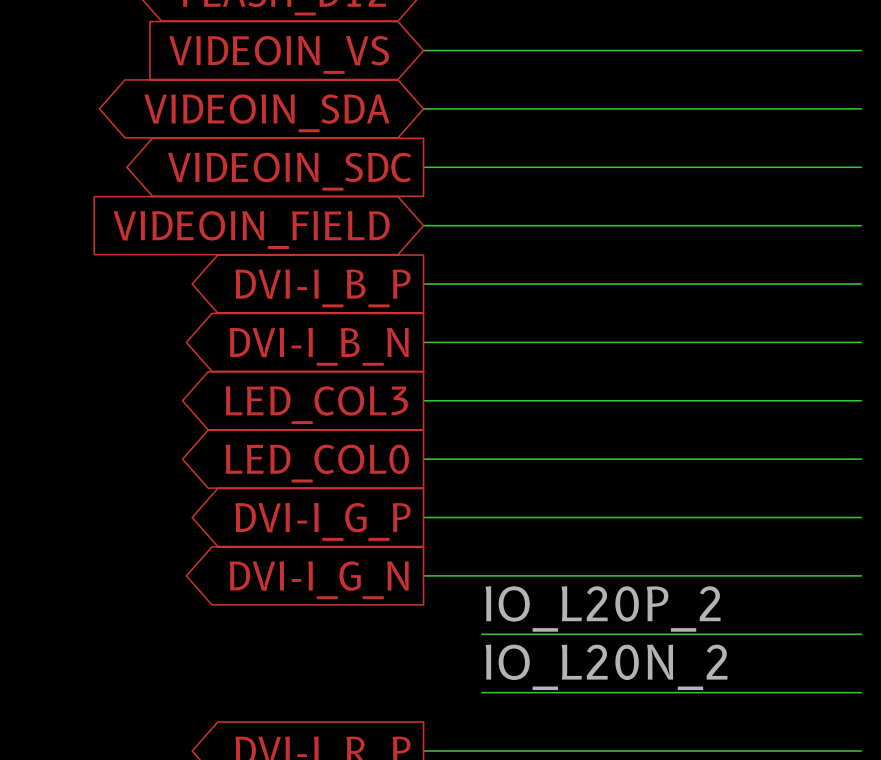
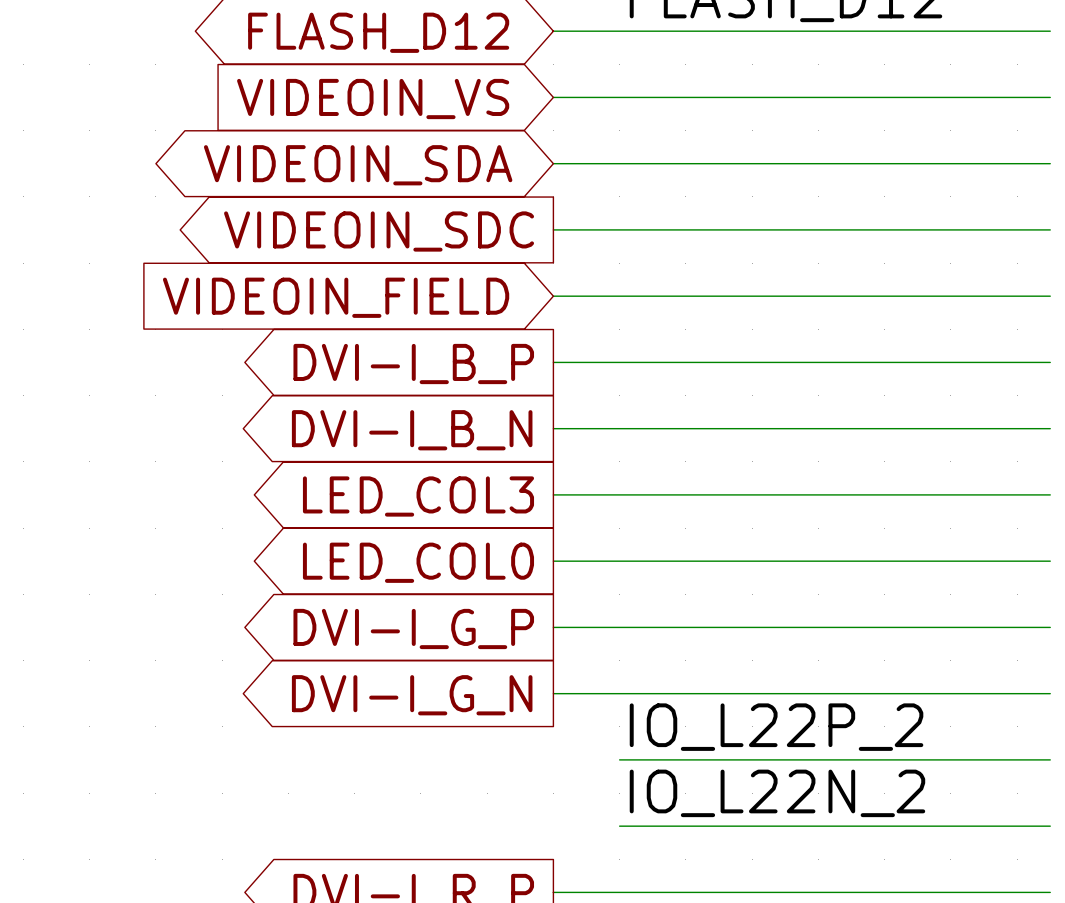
label: IO_L20P_2 (603, 608) -> IO_L22P_2 (776, 727)
label: IO_L20N_2 (606, 667) -> IO_L22N_2 (777, 793)

